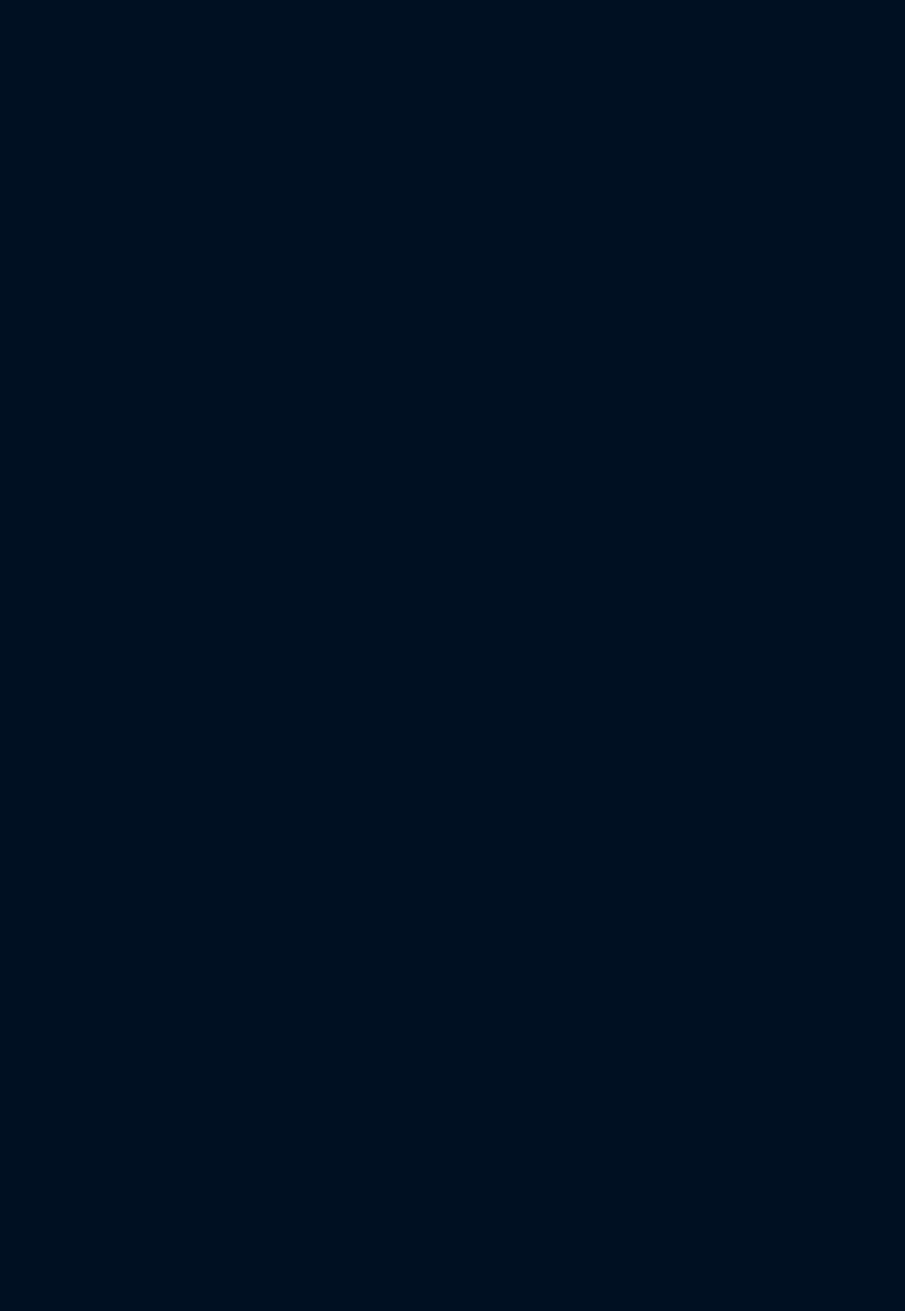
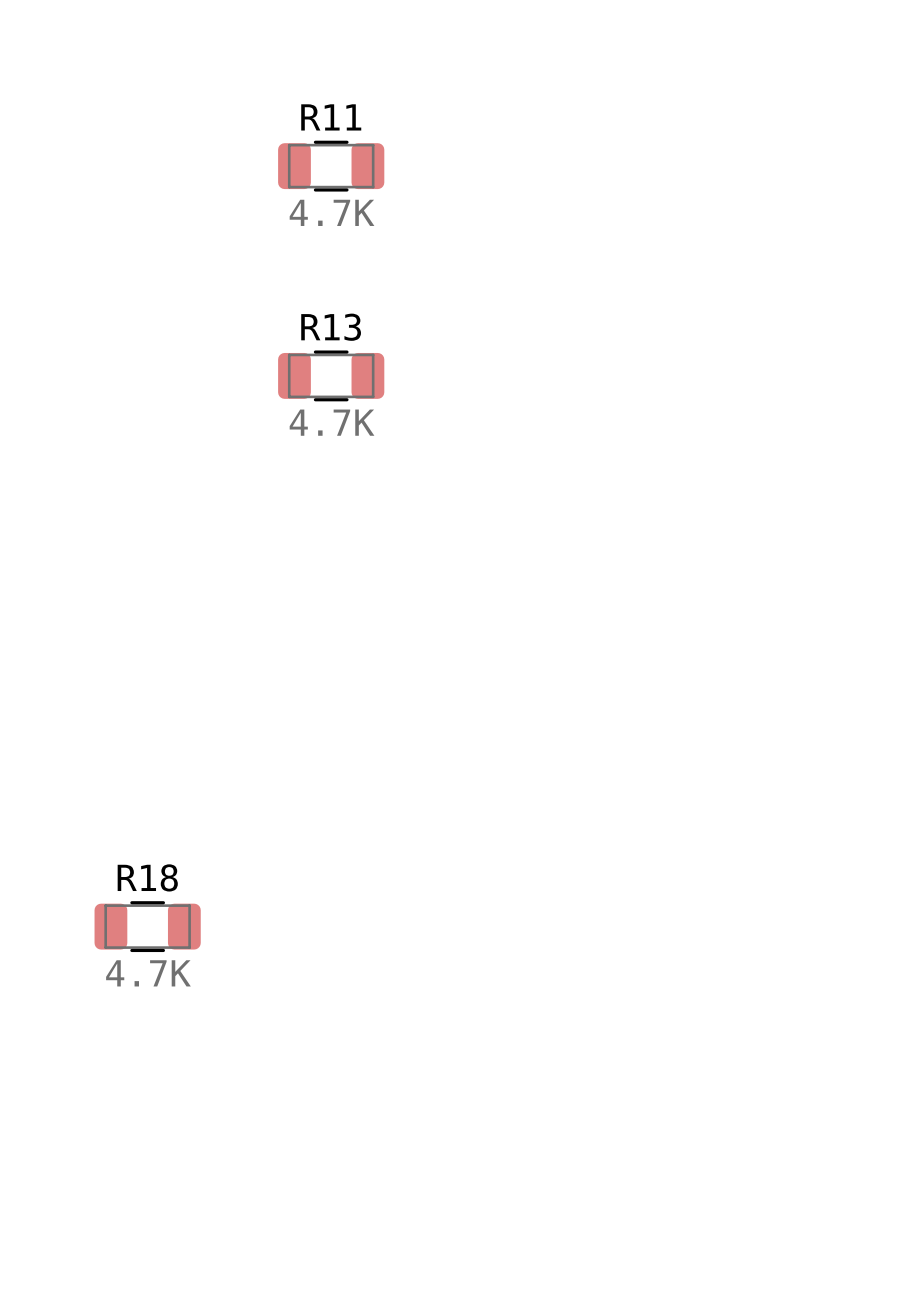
R11: none -> 4.7K (331, 166)
R13: none -> 4.7K (331, 375)
R18: none -> 4.7K (147, 926)

